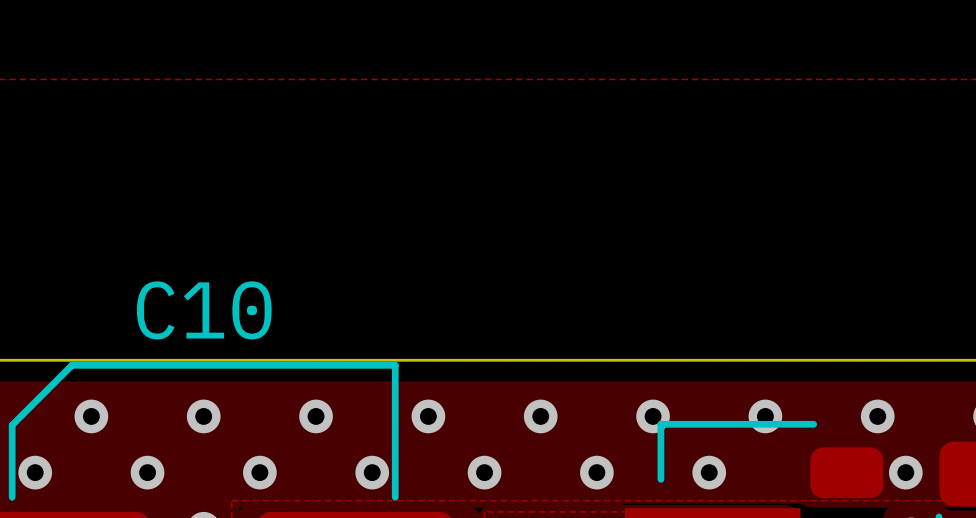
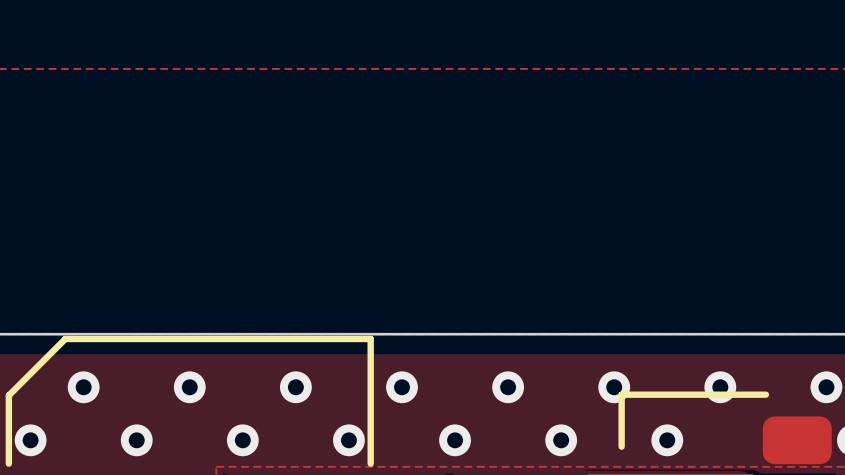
C10 name: C10 (204, 310) -> none

